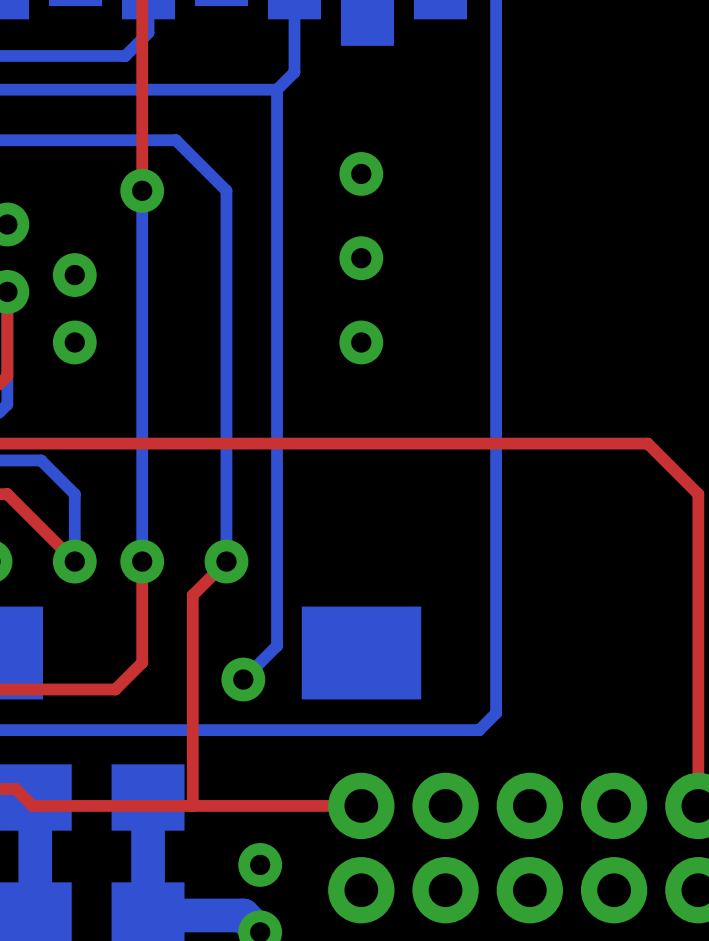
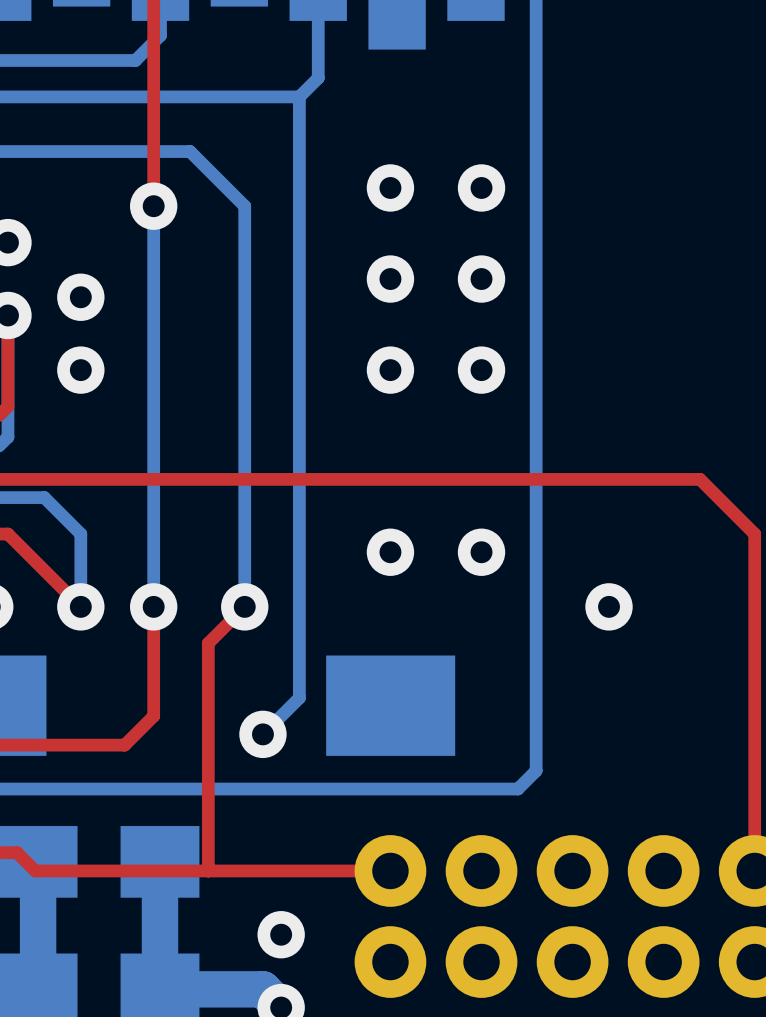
via: none -> (481, 187)
via: none -> (481, 279)
via: none -> (481, 370)
via: none -> (390, 552)
via: none -> (481, 552)
via: none -> (609, 606)

